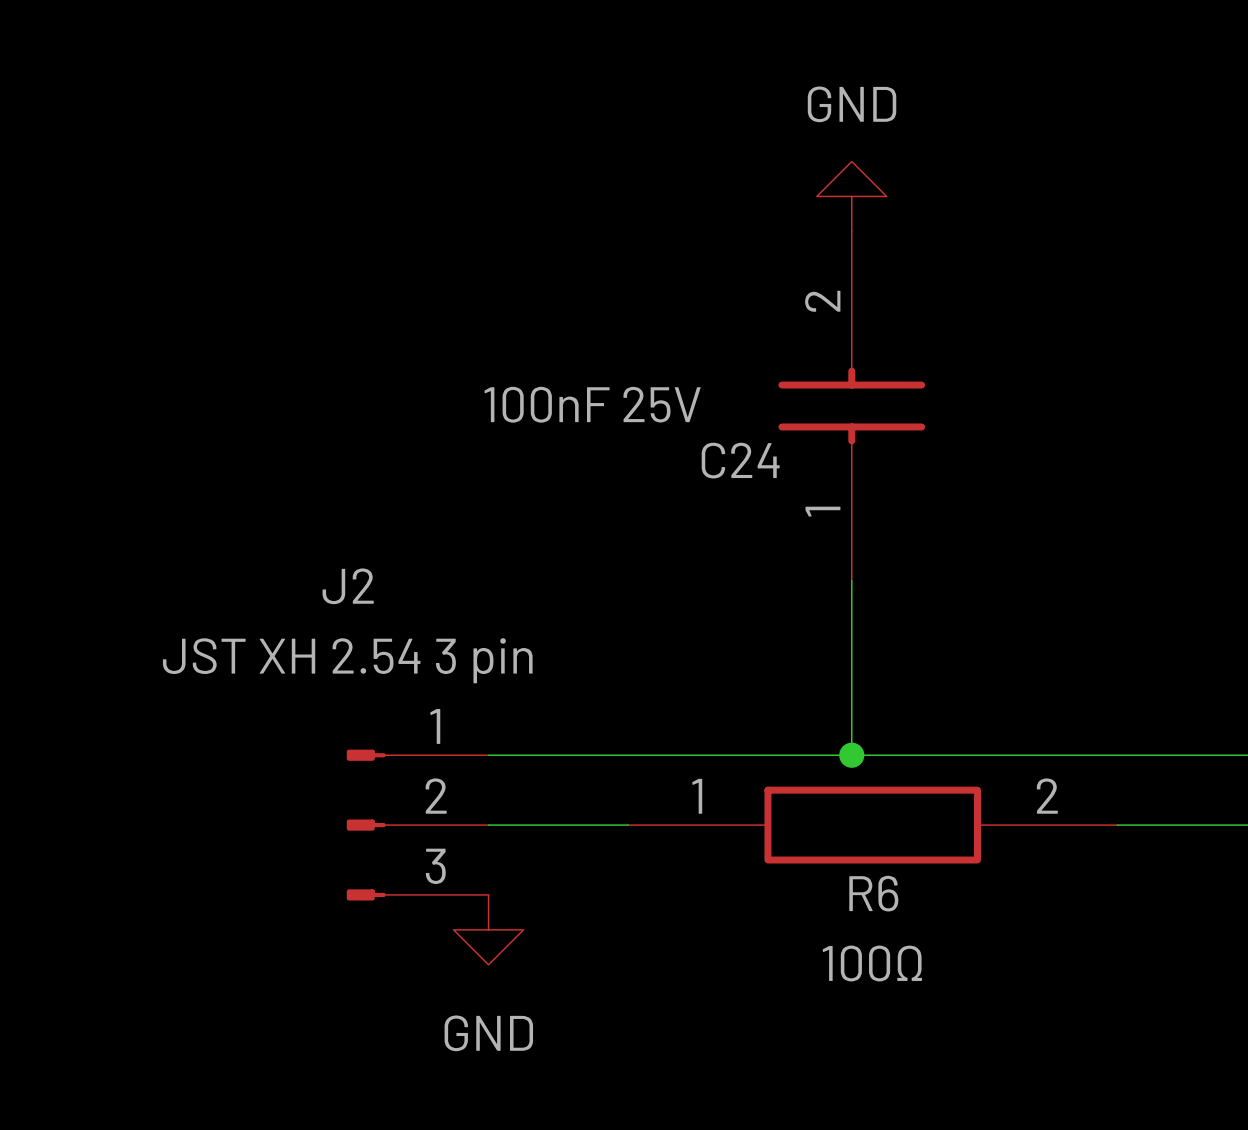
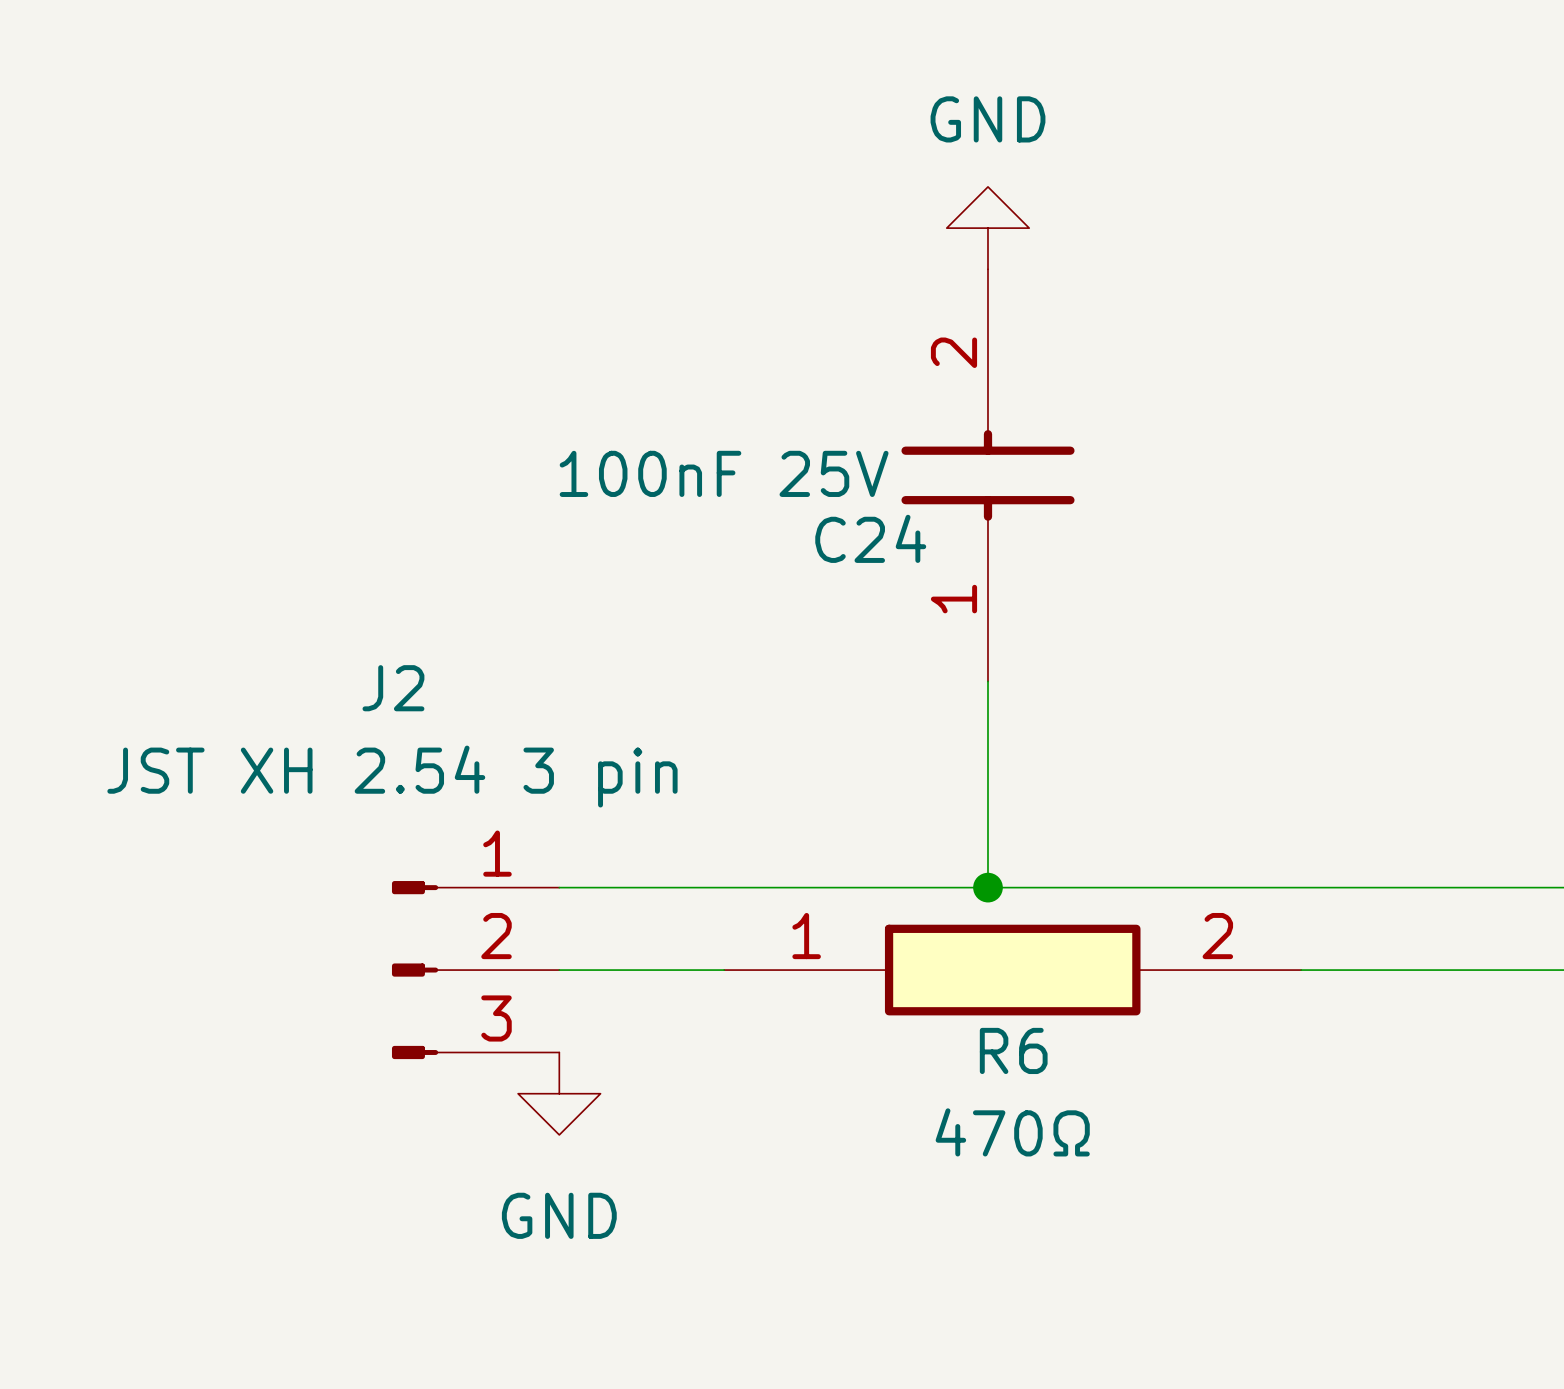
R6 value: 100Ω (872, 963) -> 470Ω (1012, 1132)

